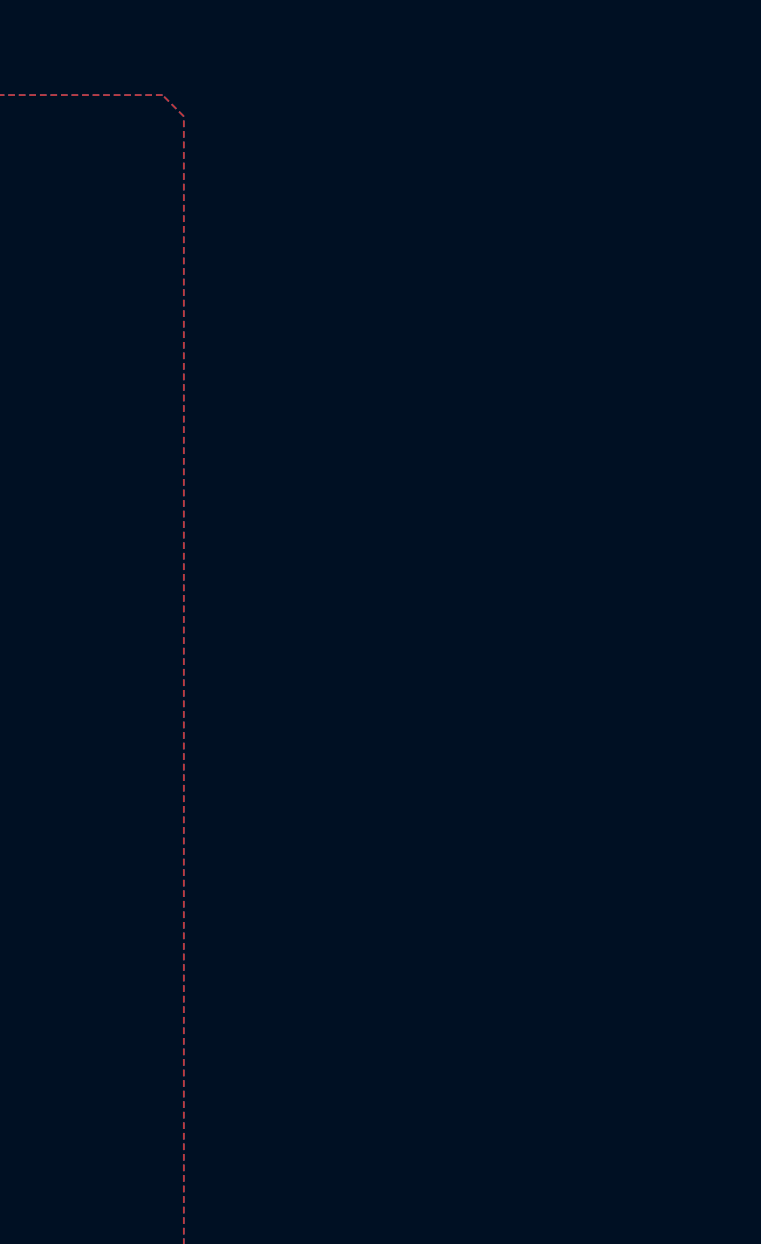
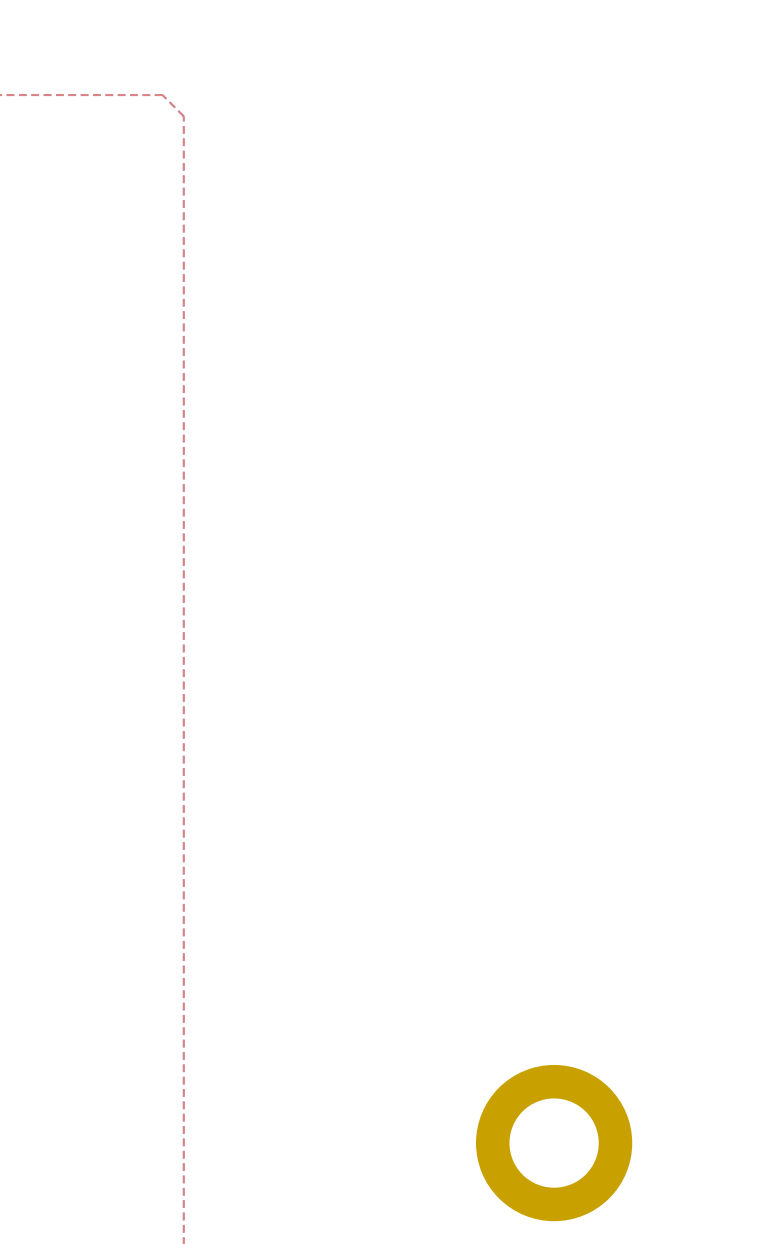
part: none -> (554, 1143)

